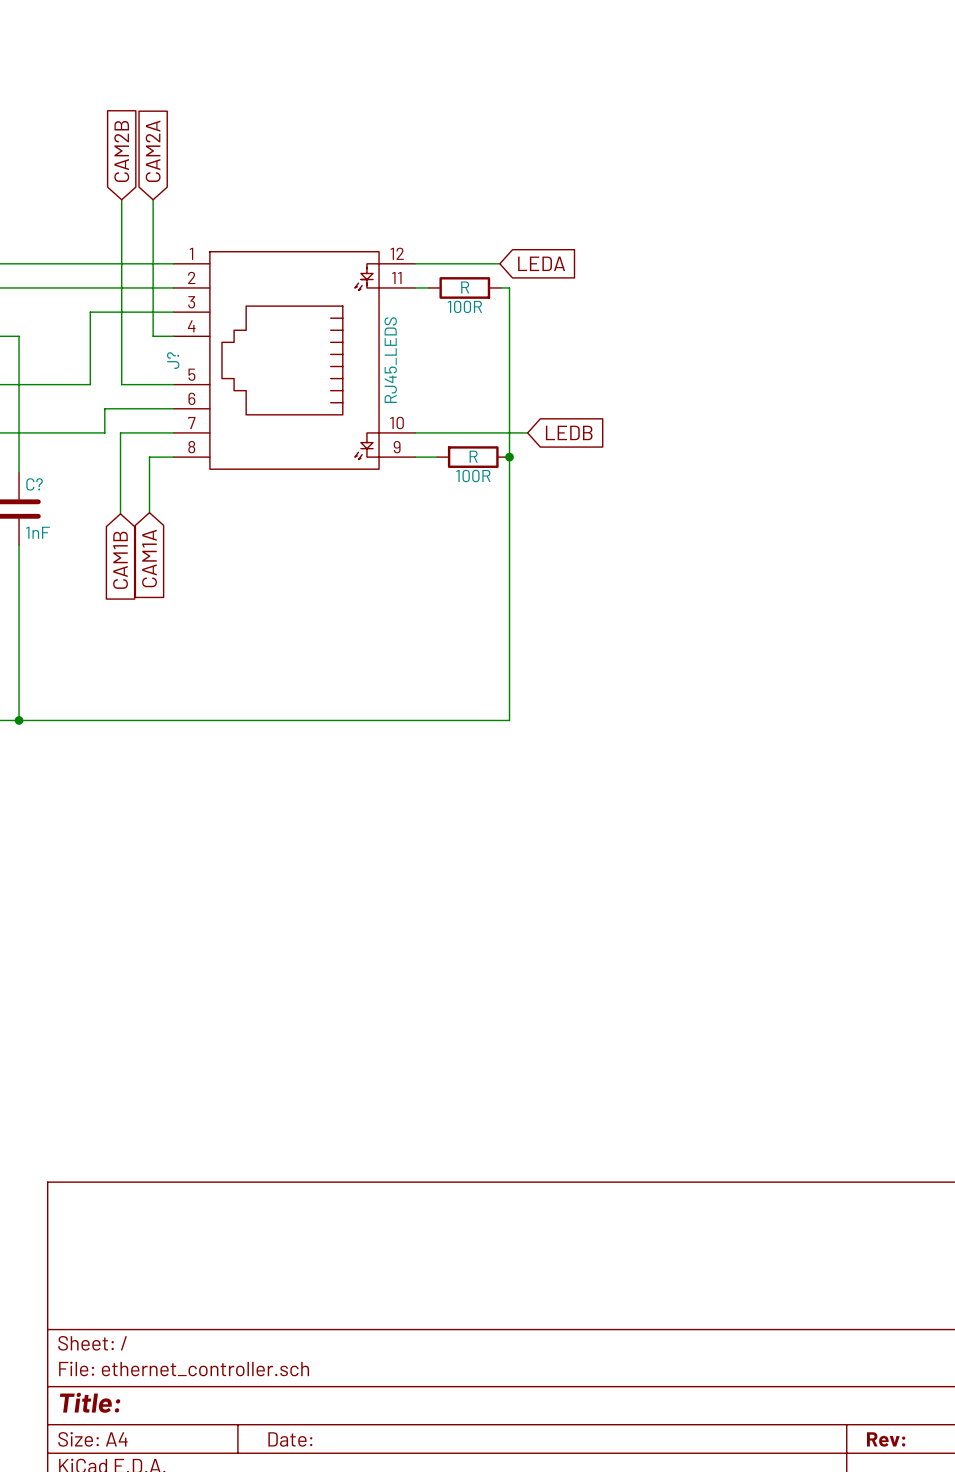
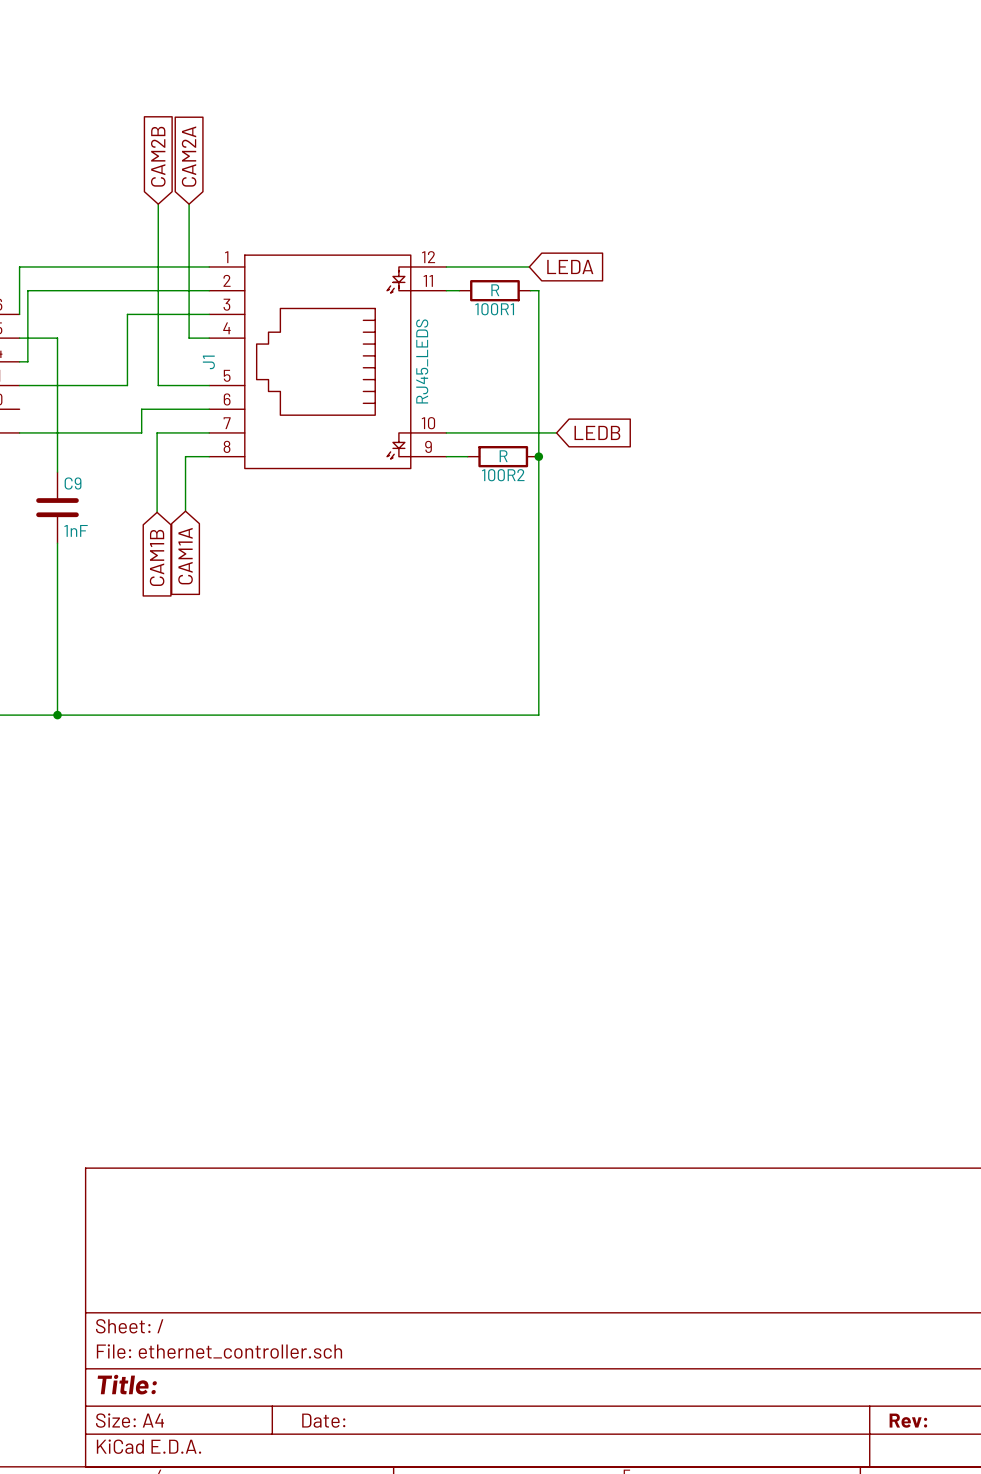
100R name: 100R (464, 306) -> 100R1 (494, 309)
J? name: J? (173, 360) -> J1 (208, 362)
100R name: 100R (473, 475) -> 100R2 (503, 475)
C? name: C? (34, 484) -> C9 (73, 483)

